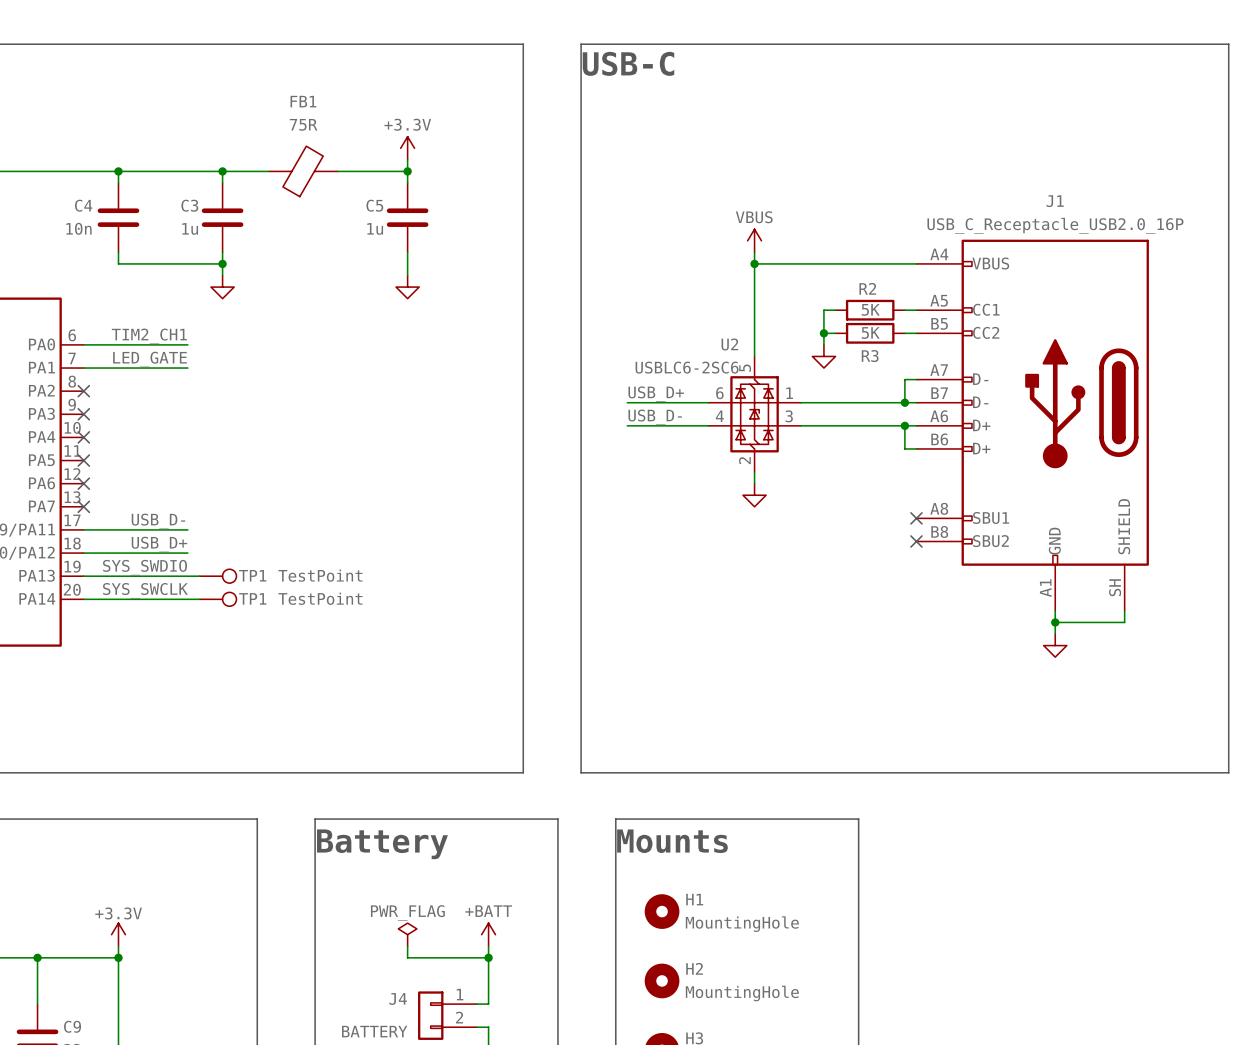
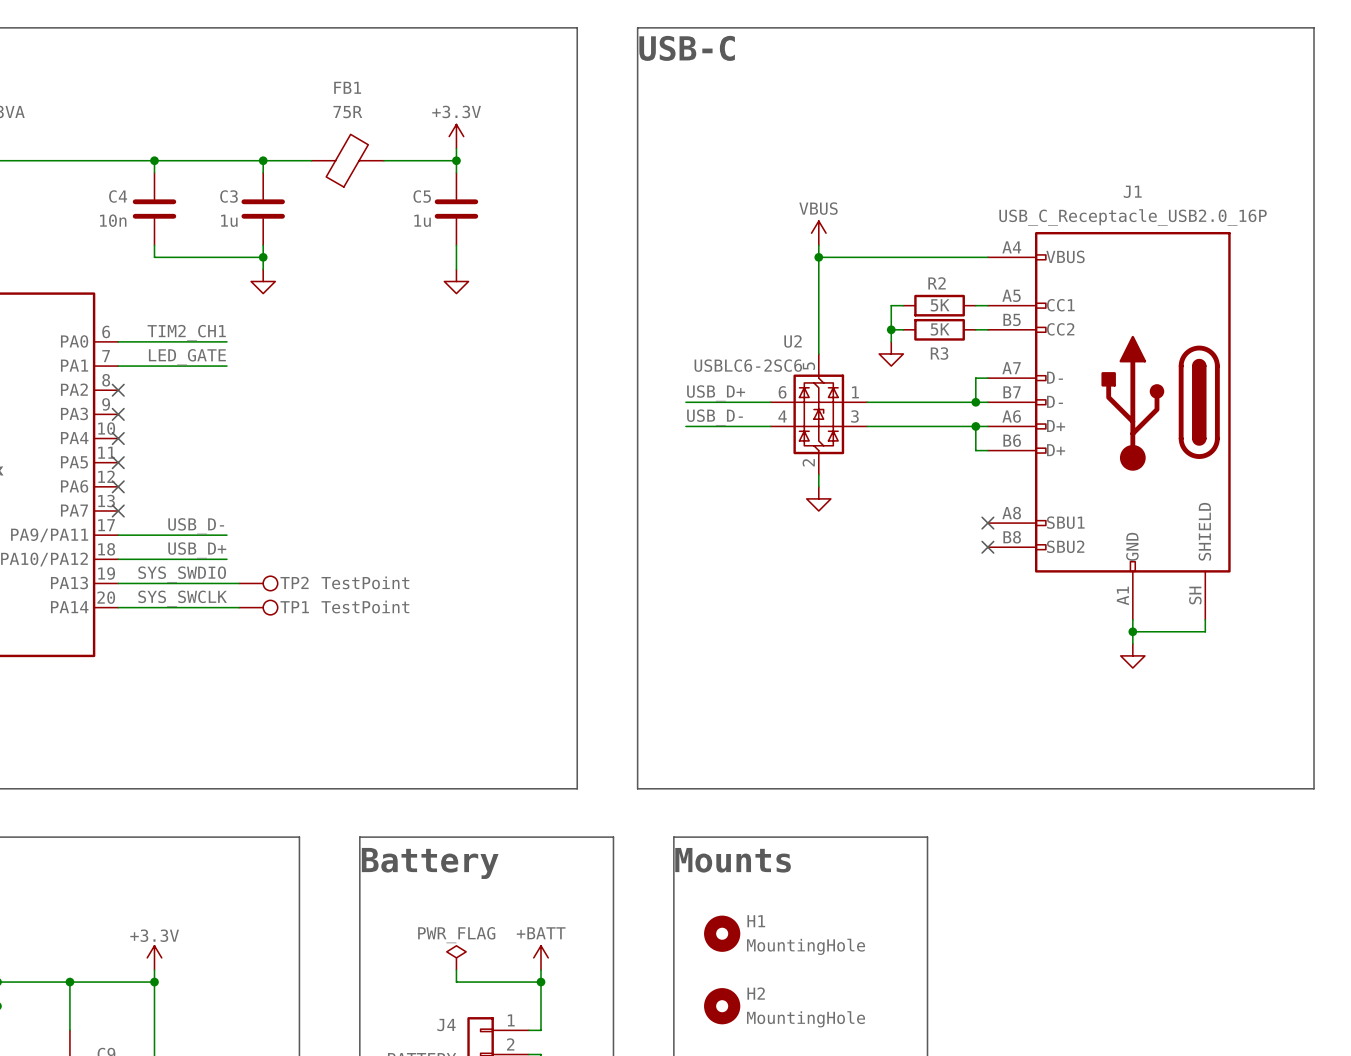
TP1 name: TP1 (252, 575) -> TP2 (294, 582)

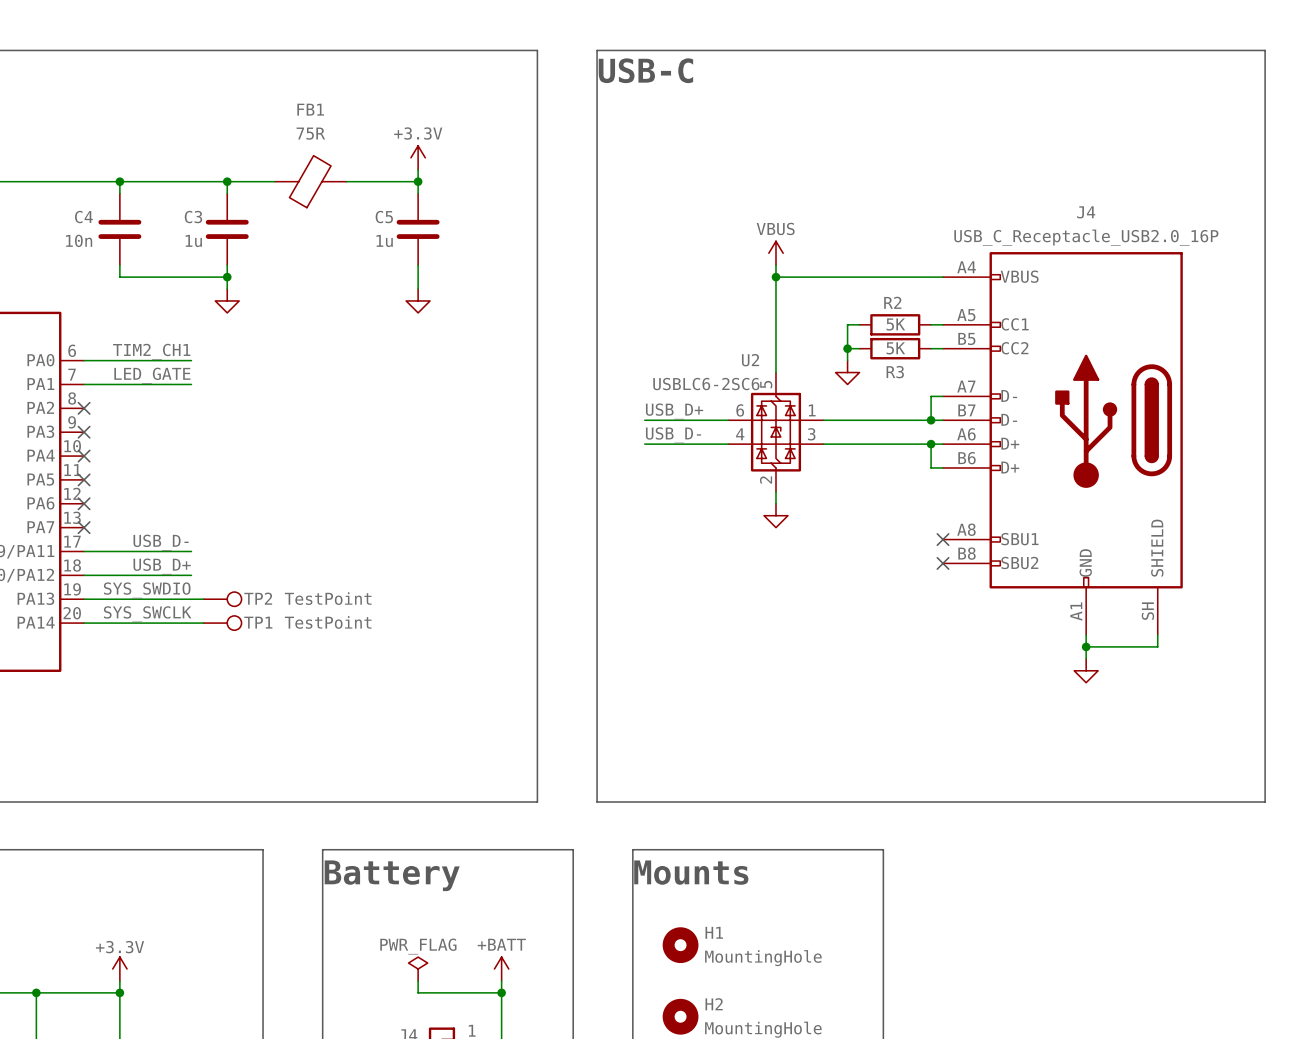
J1 name: J1 (1132, 191) -> J4 (1086, 212)

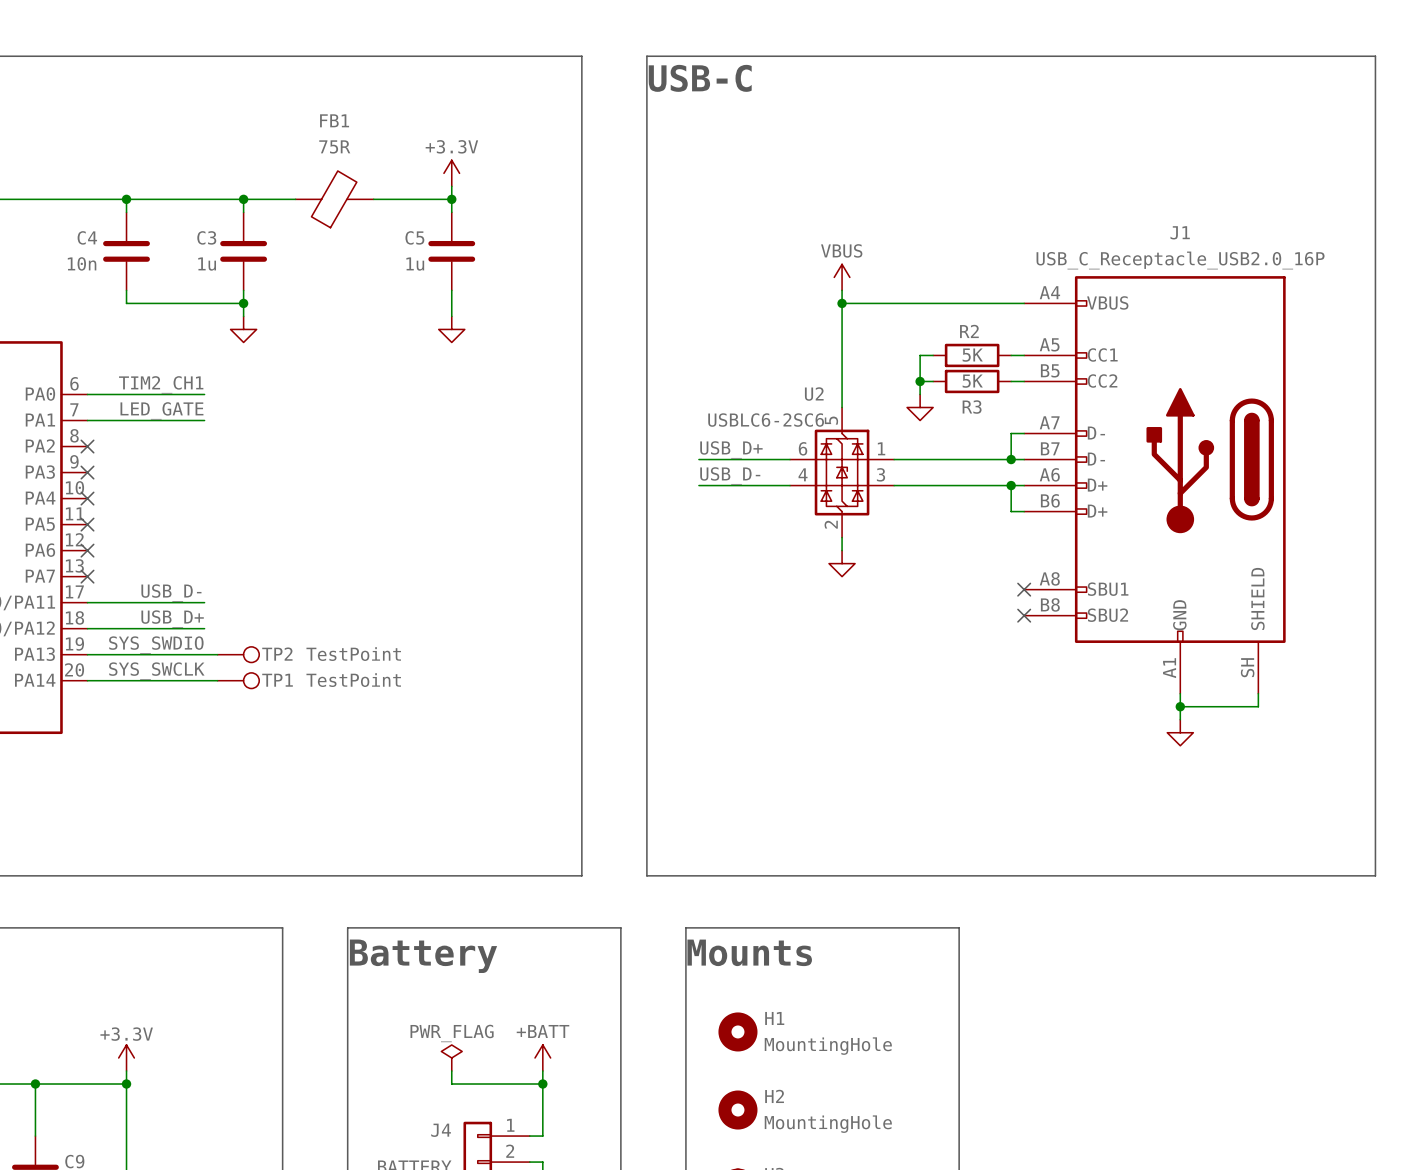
J4 name: J4 (1086, 212) -> J1 (1180, 232)

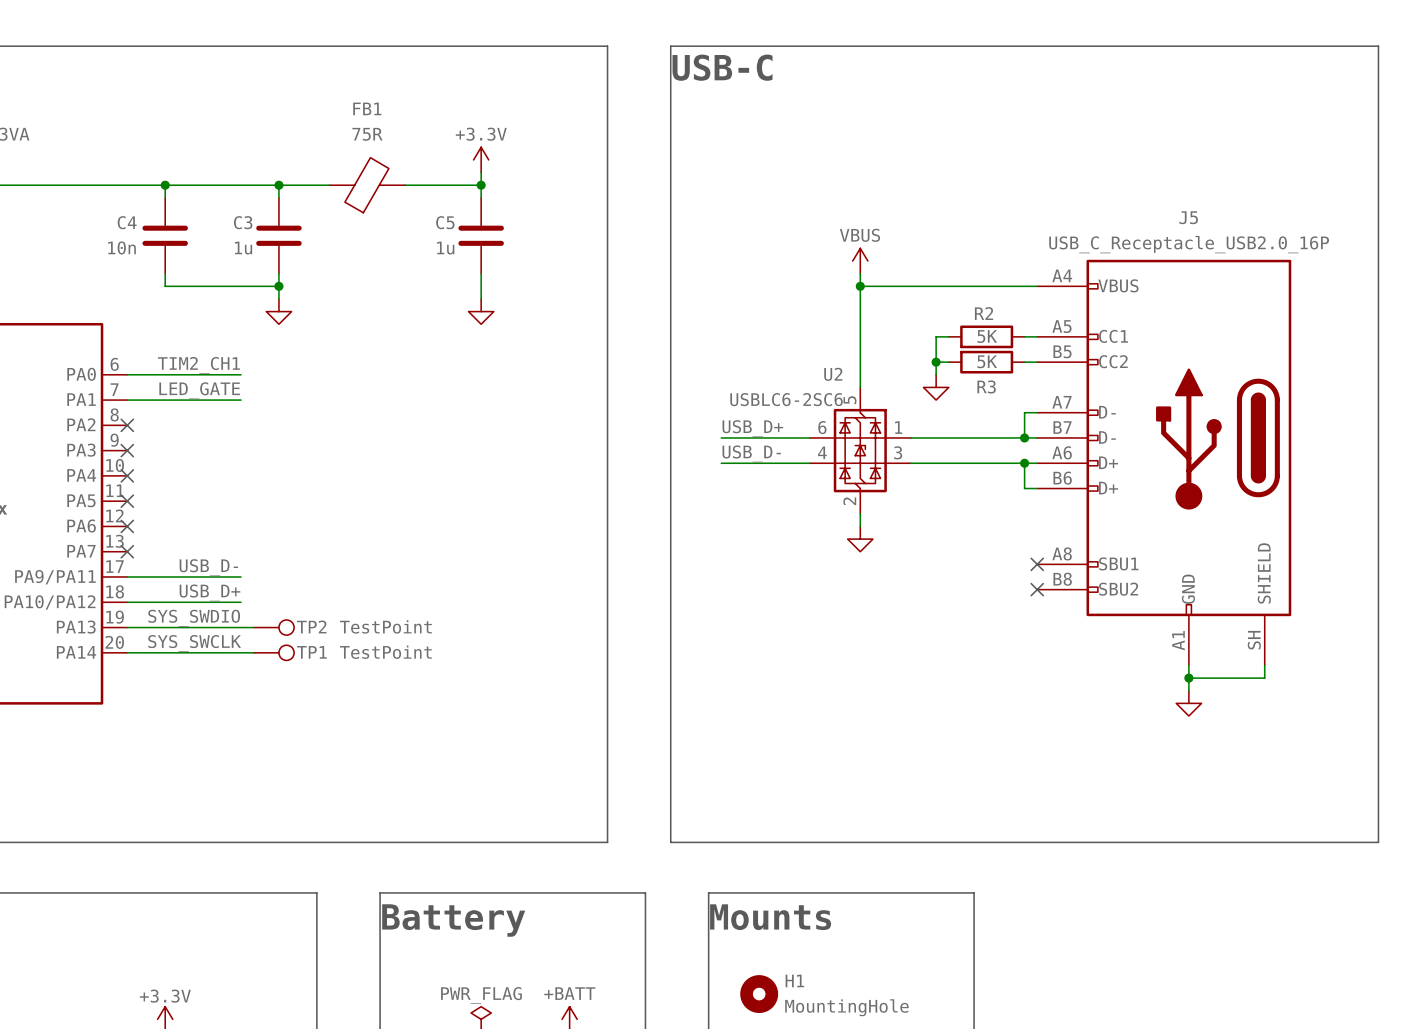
J1 name: J1 (1180, 232) -> J5 (1188, 217)

